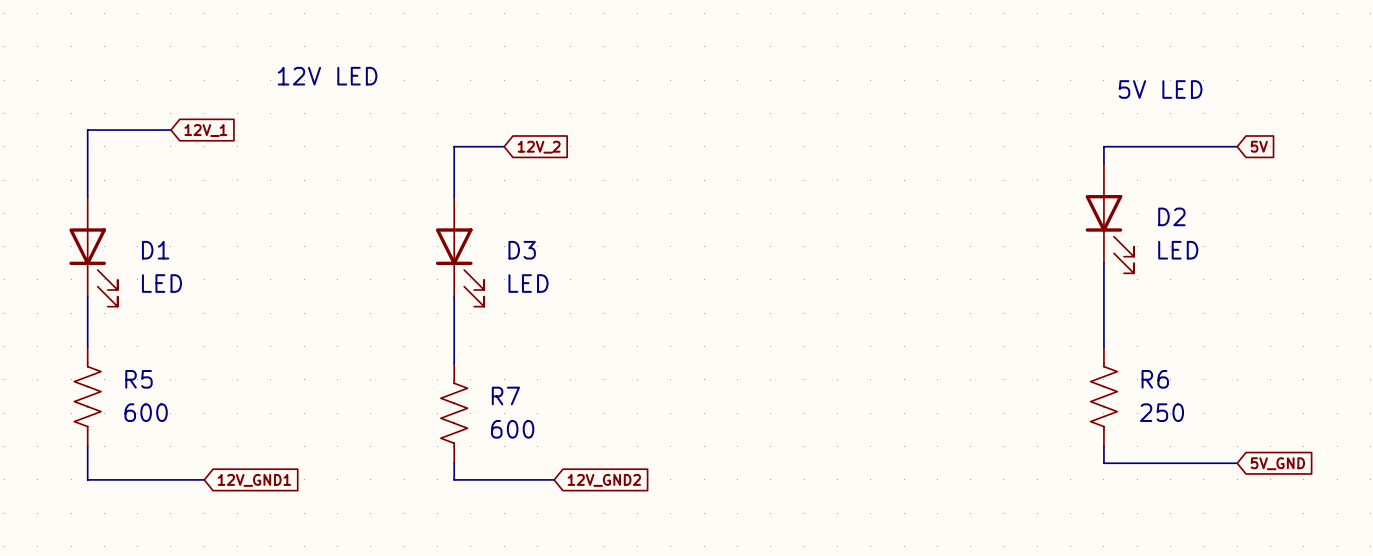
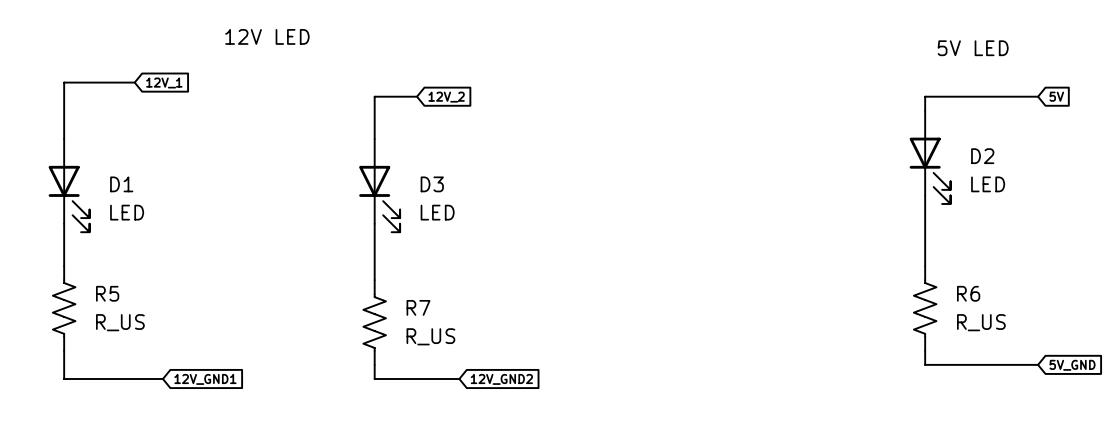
R5 value: 600 (146, 412) -> R_US (120, 322)
R6 value: 250 (1161, 412) -> R_US (981, 322)
R7 value: 600 (512, 429) -> R_US (430, 336)

